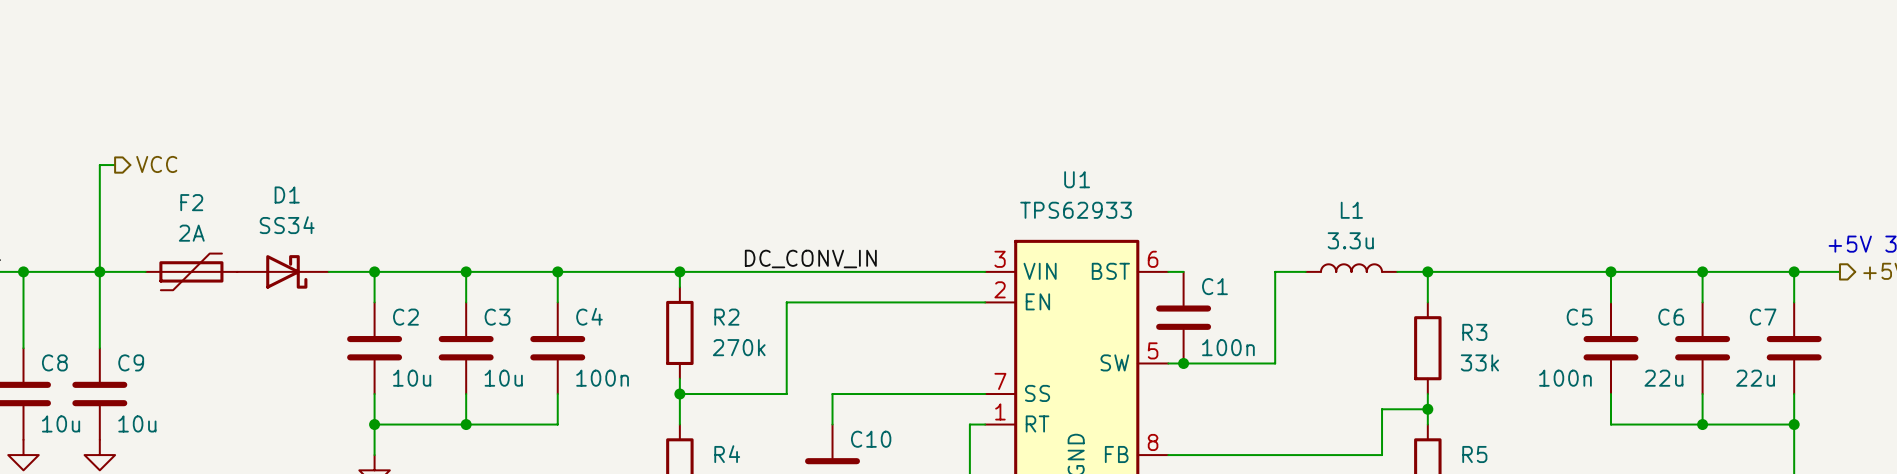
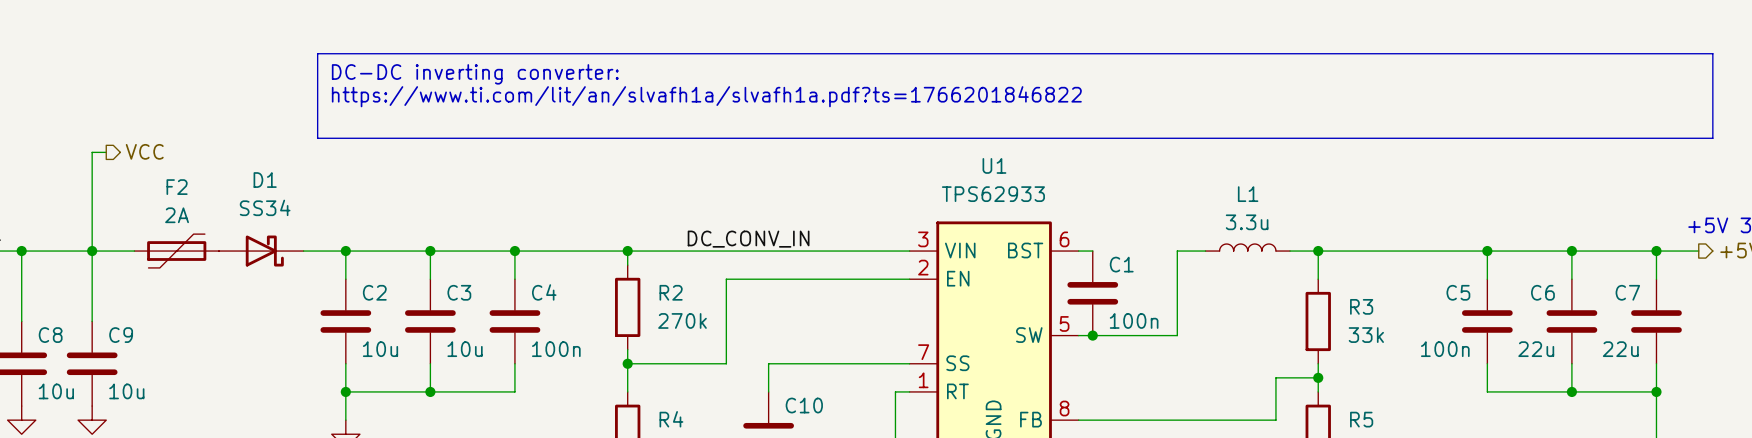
line: none -> (317, 53) (1712, 53) (1712, 138) (317, 138) (317, 53)
text: none -> DC-DC inverting converter: (475, 74)
text: none -> https://www.ti.com/lit/an/slvafh1a/slvafh1a.pdf?ts=1766201846822 (706, 96)

